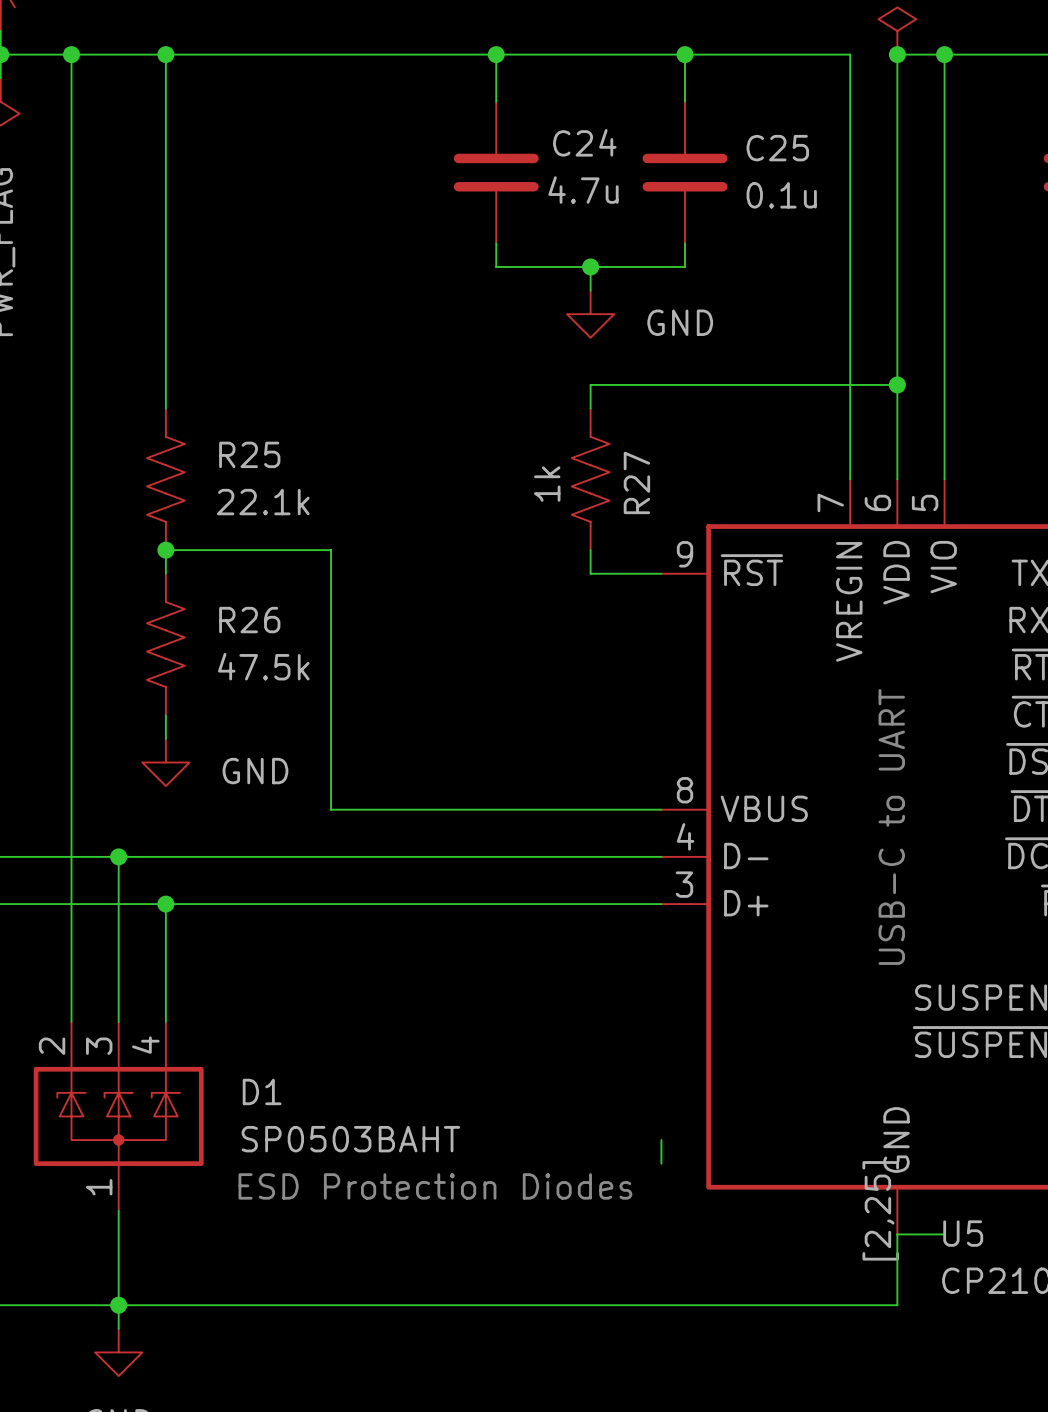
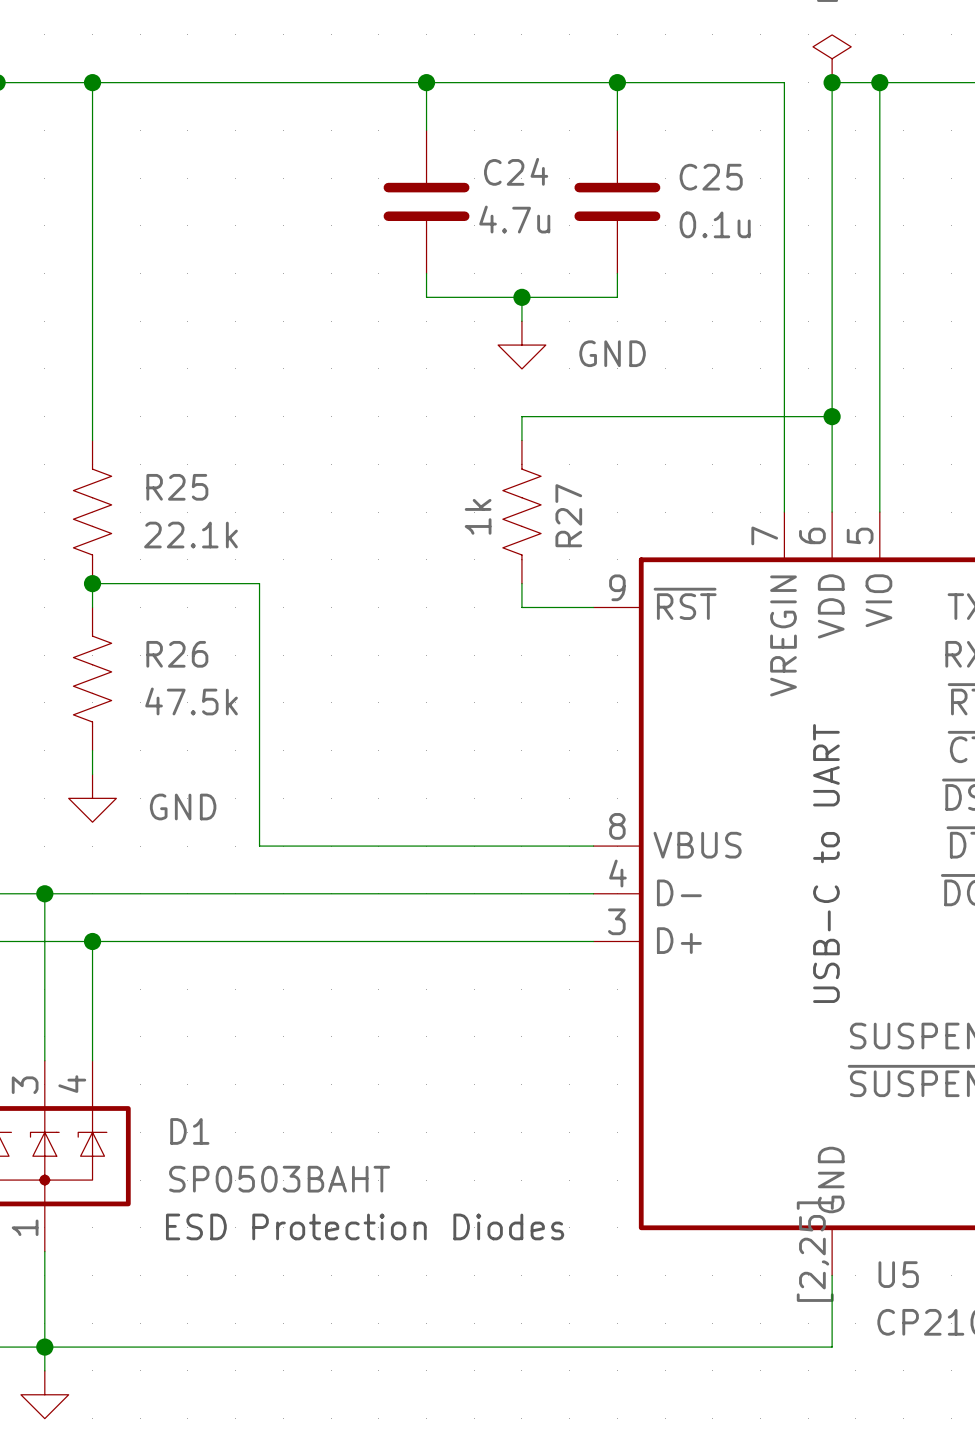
wire: (661, 1140) (661, 1163) -> none
wire: (897, 1234) (944, 1234) -> none

